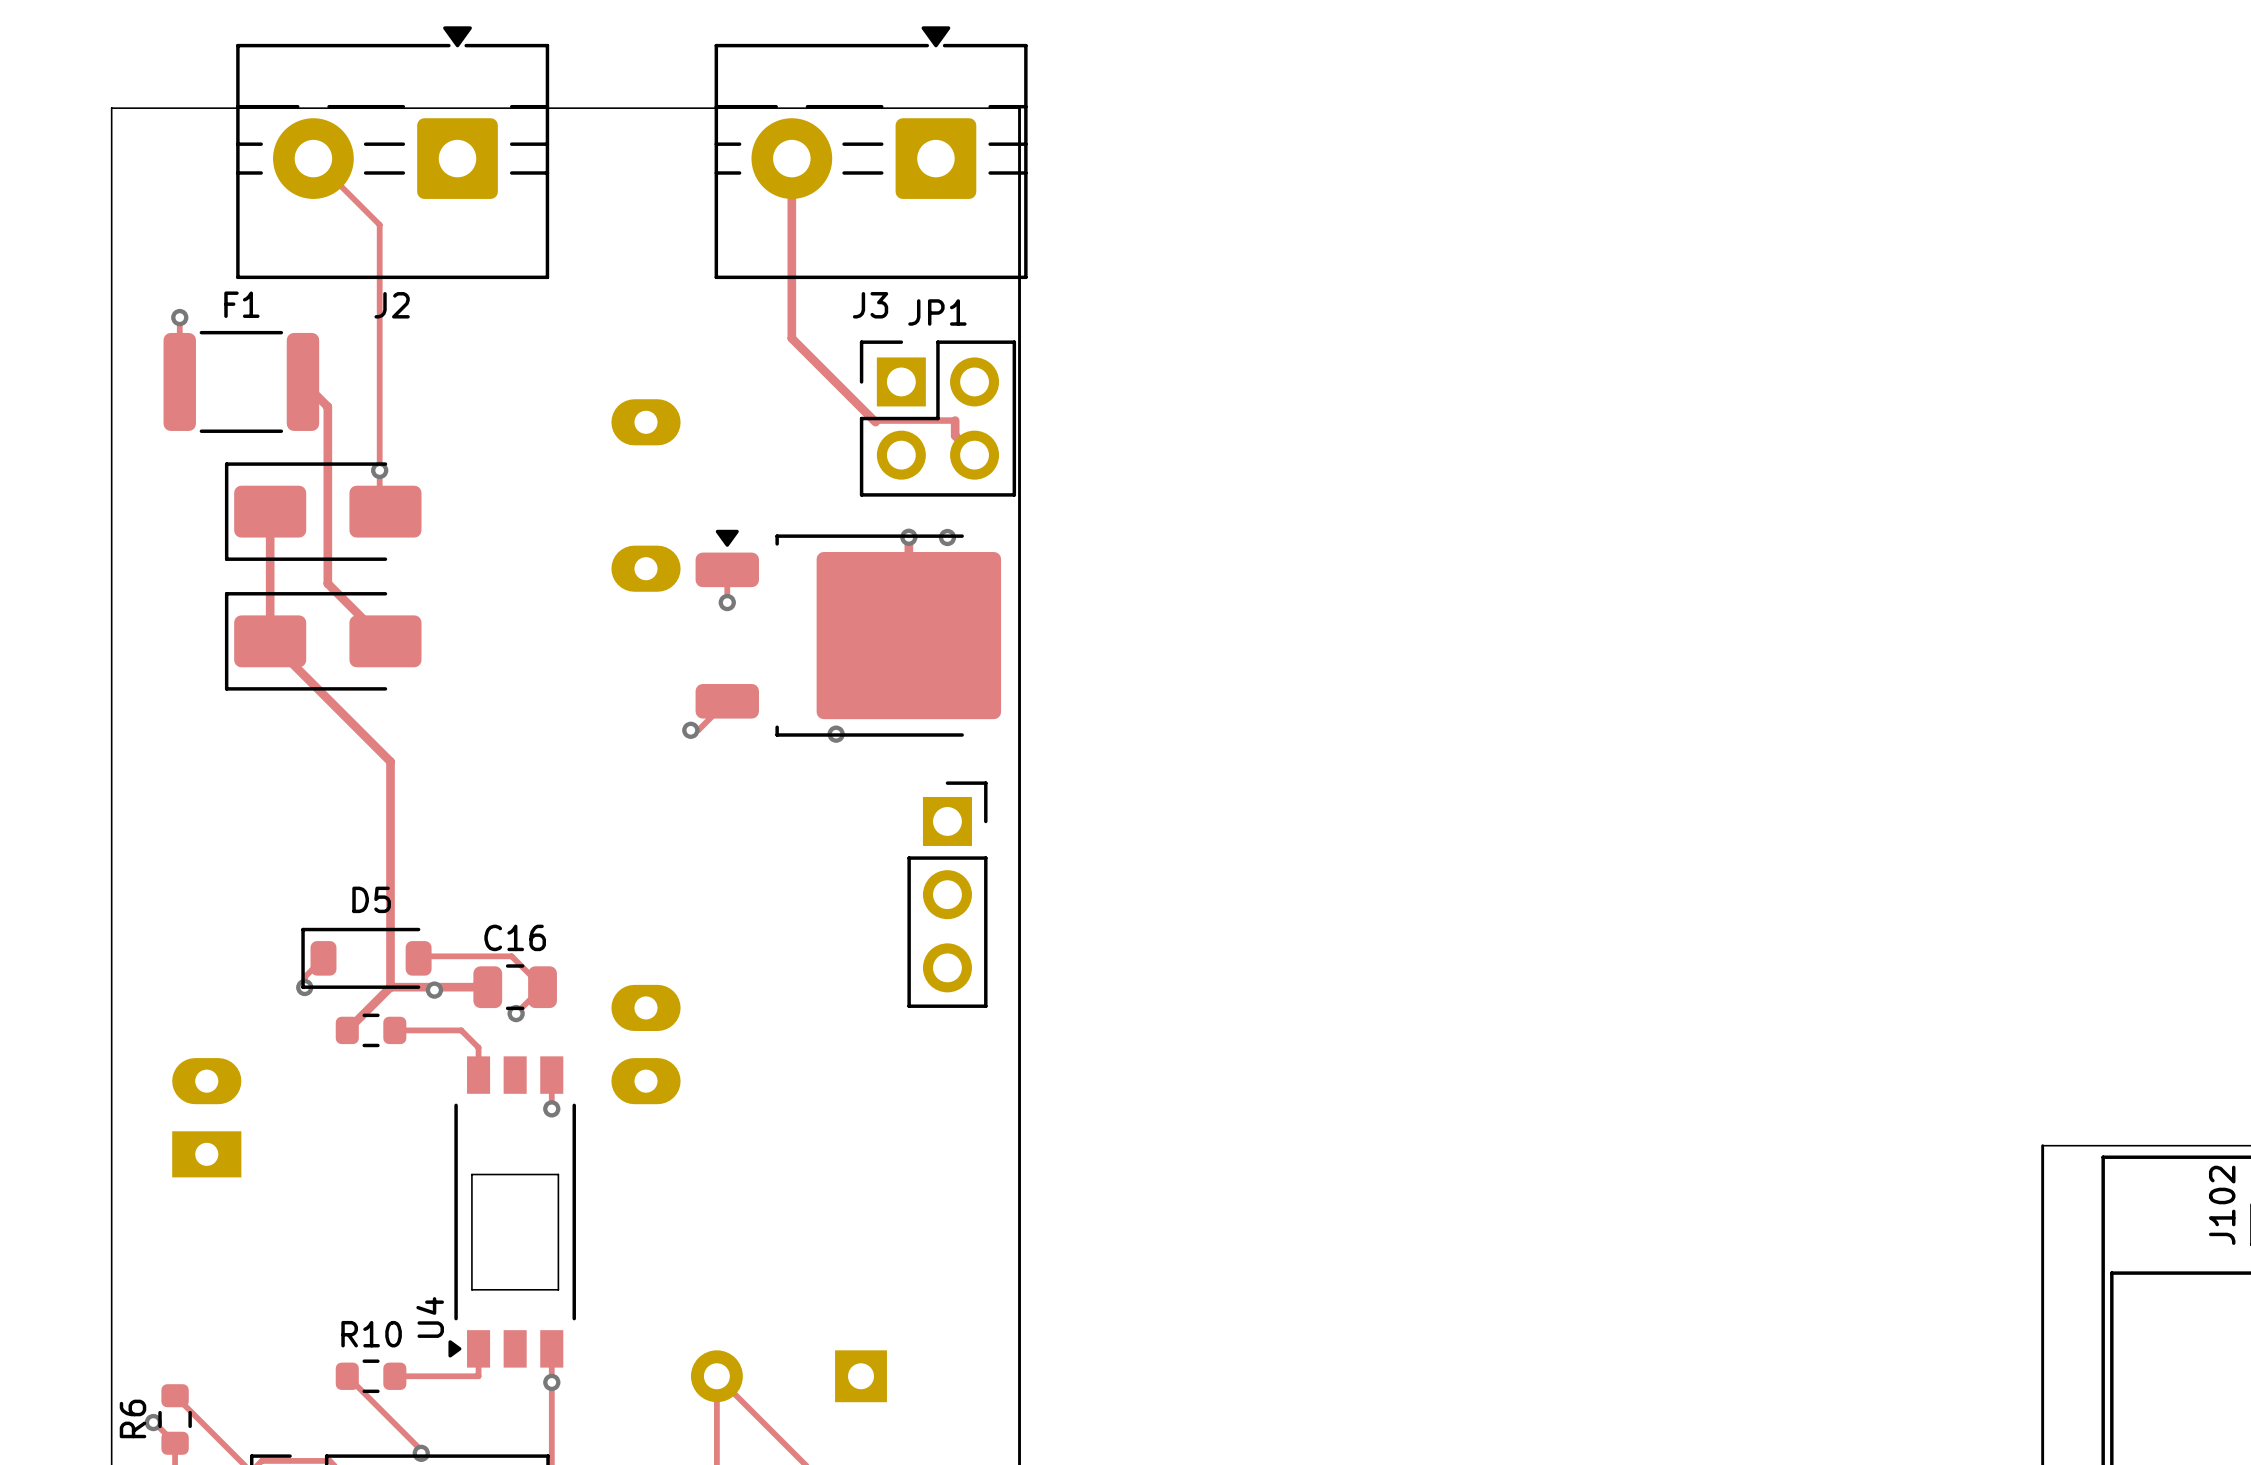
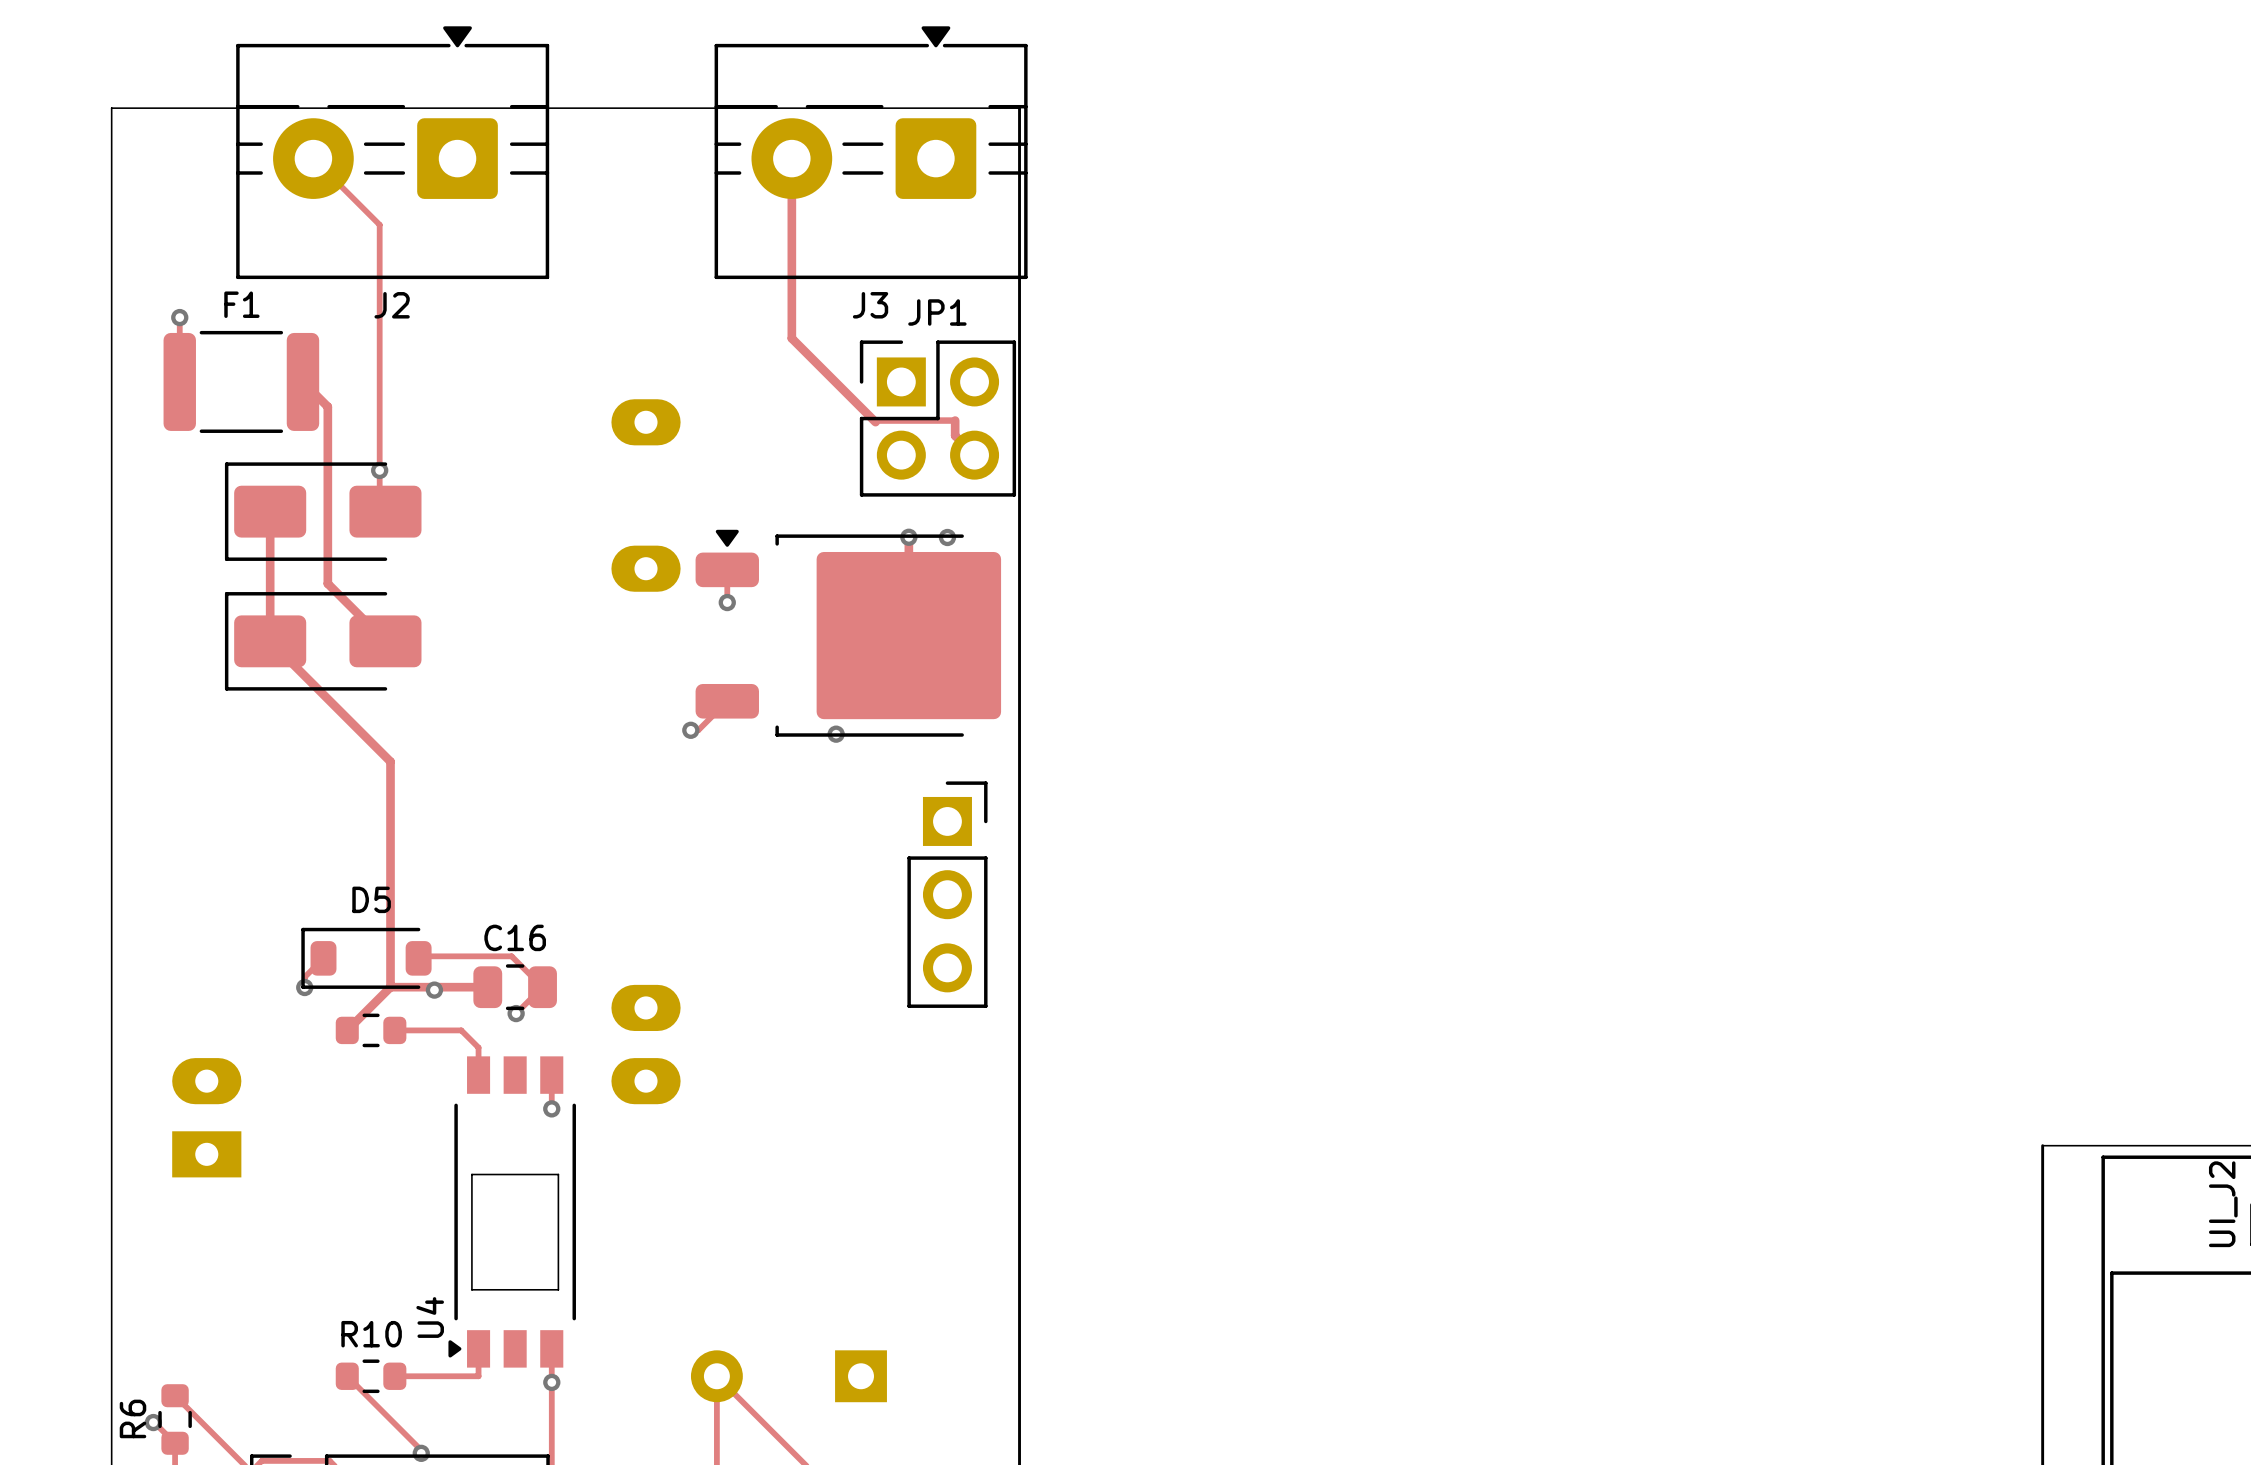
J102 name: J102 (2222, 1205) -> UI_J2 (2223, 1204)

